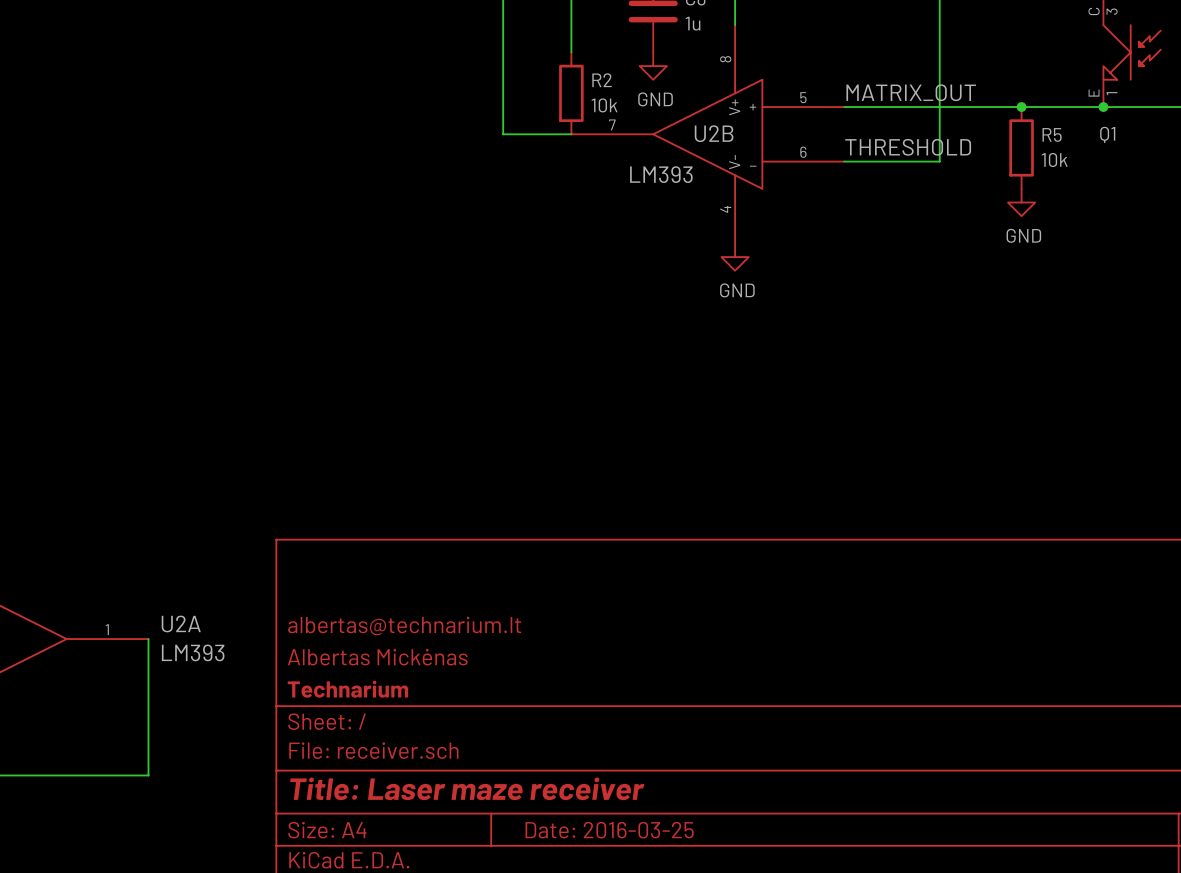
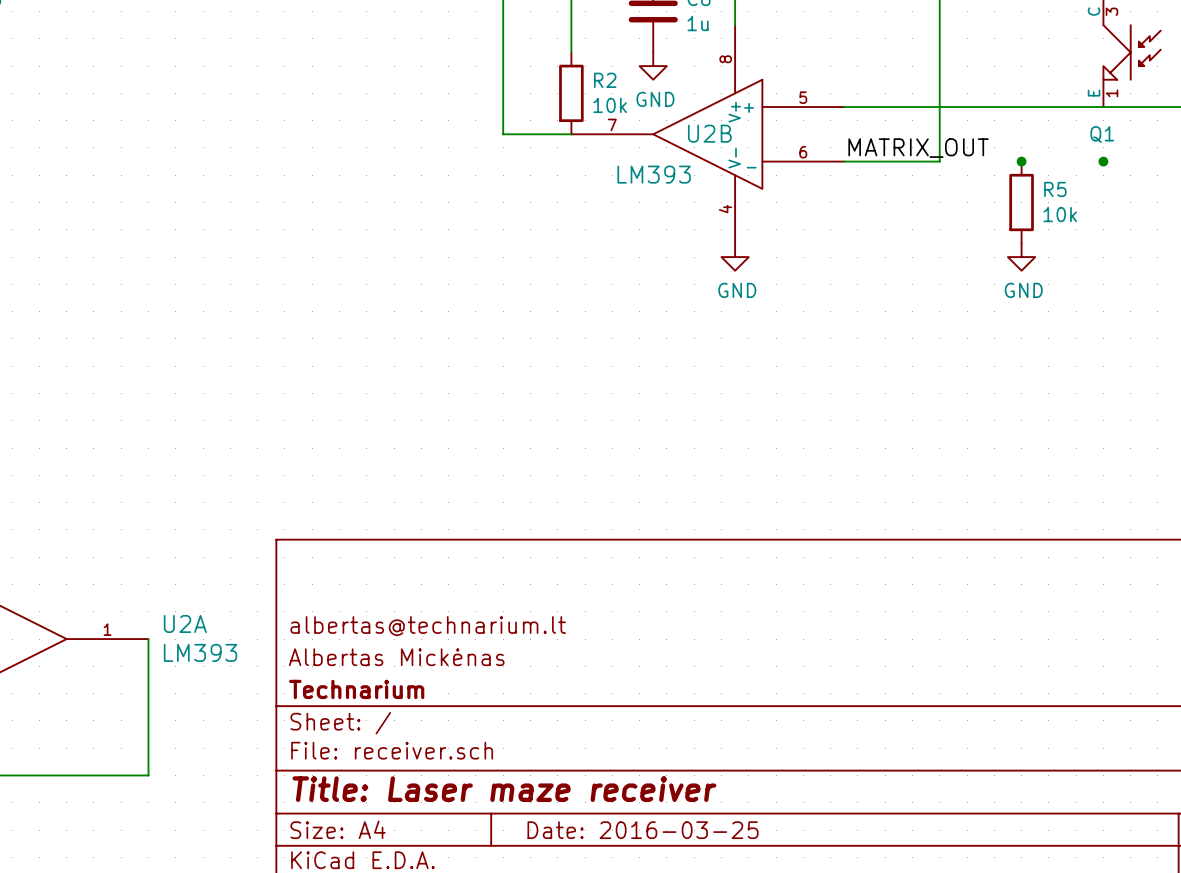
label: MATRIX_OUT (911, 92) -> none
junction: (1021, 107) -> none
junction: (1103, 107) -> none
label: THRESHOLD (908, 147) -> MATRIX_OUT (918, 148)
R5 position: (1021, 147) -> (1021, 202)
junction: none -> (1021, 161)
junction: none -> (1103, 161)
power symbol position: GND (1021, 202) -> GND (1021, 257)

